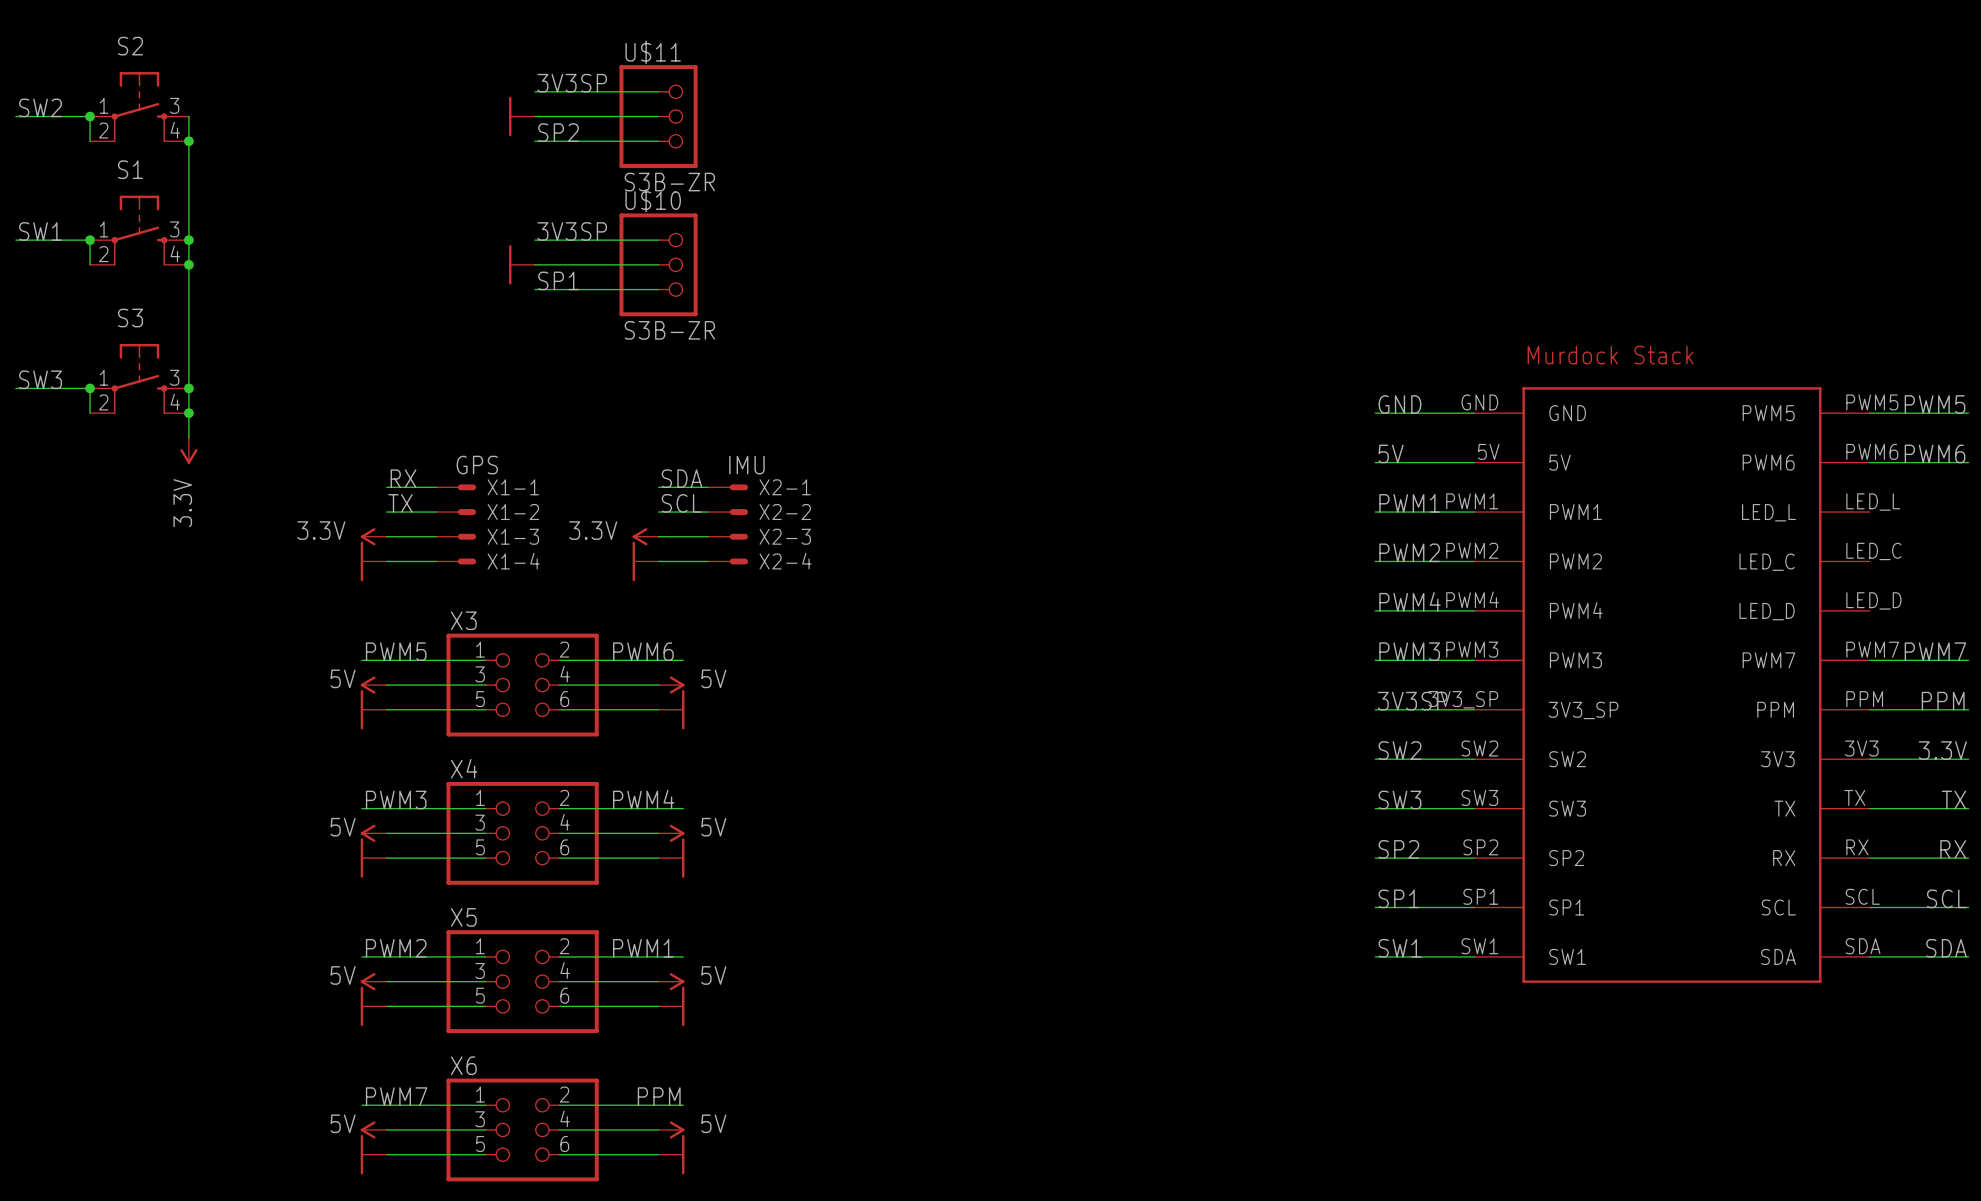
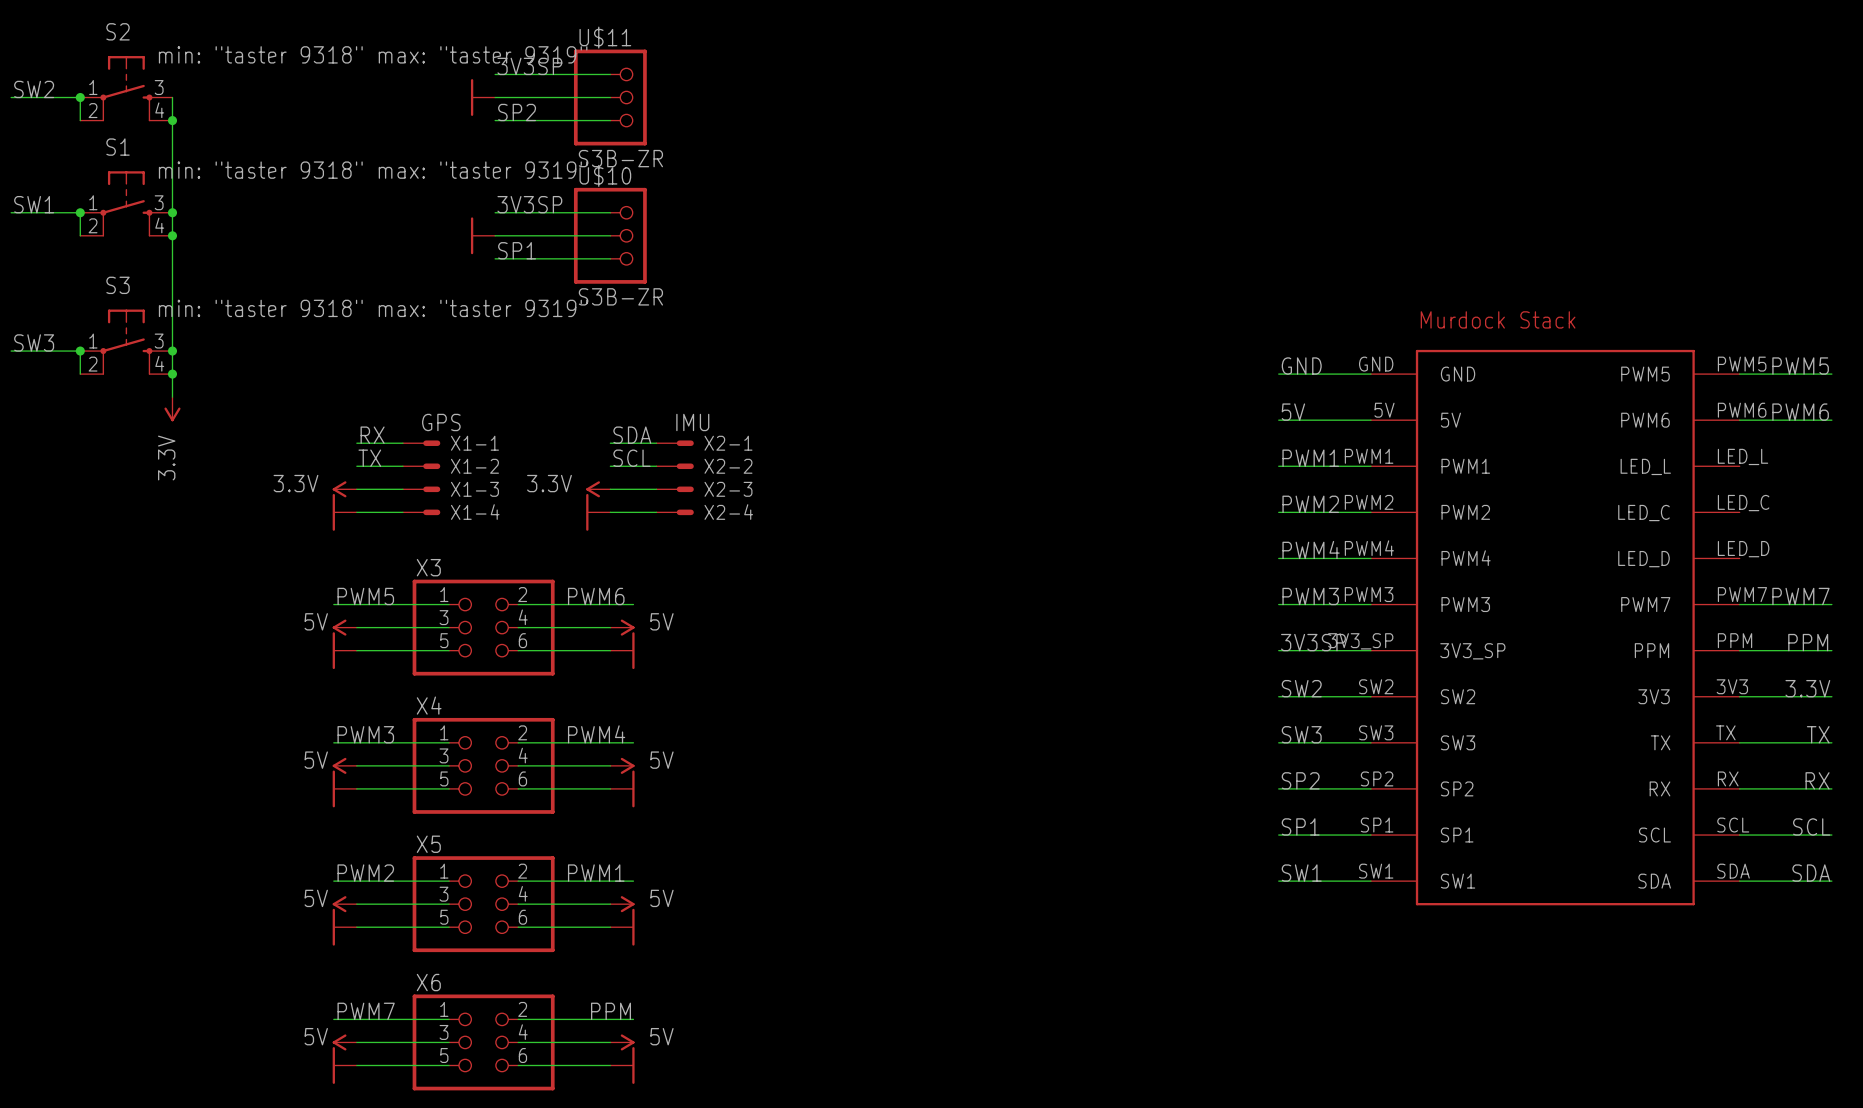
S2 value: none -> min: "taster 9318" max: "taster 9319" (373, 54)
S1 value: none -> min: "taster 9318" max: "taster 9319" (373, 170)
S3 value: none -> min: "taster 9318" max: "taster 9319" (373, 308)

